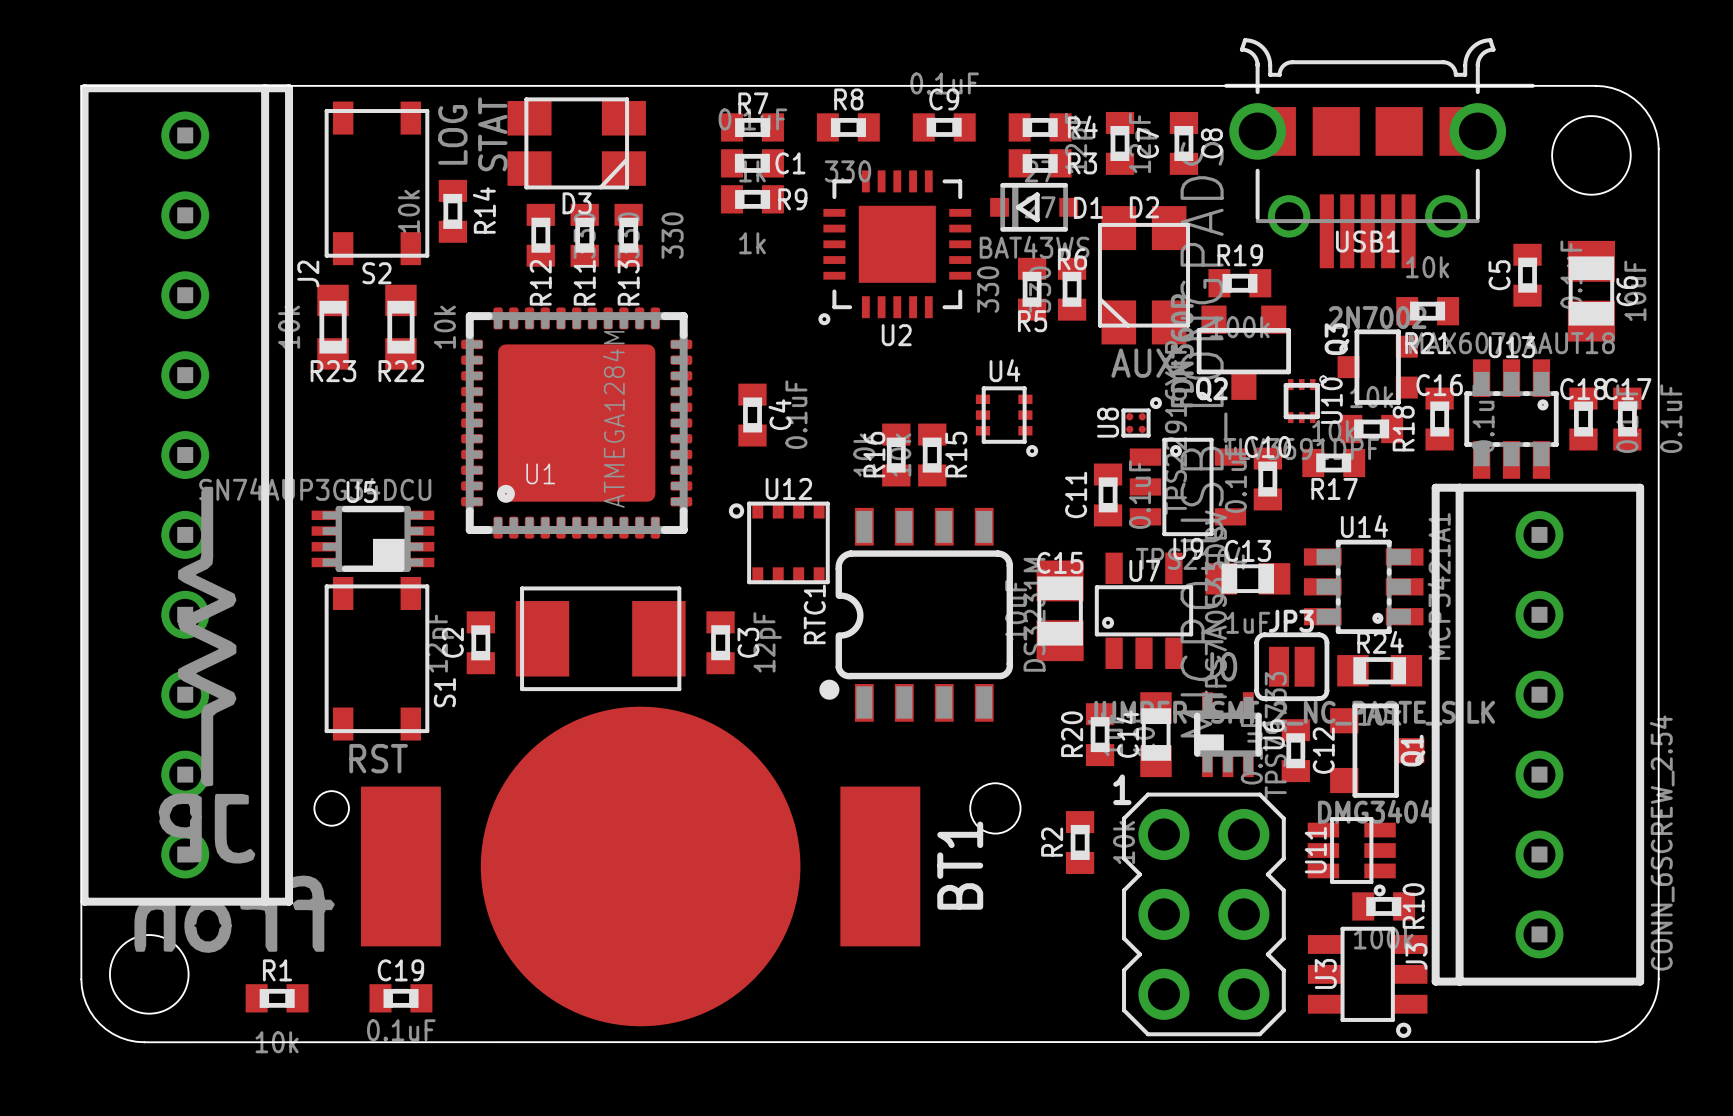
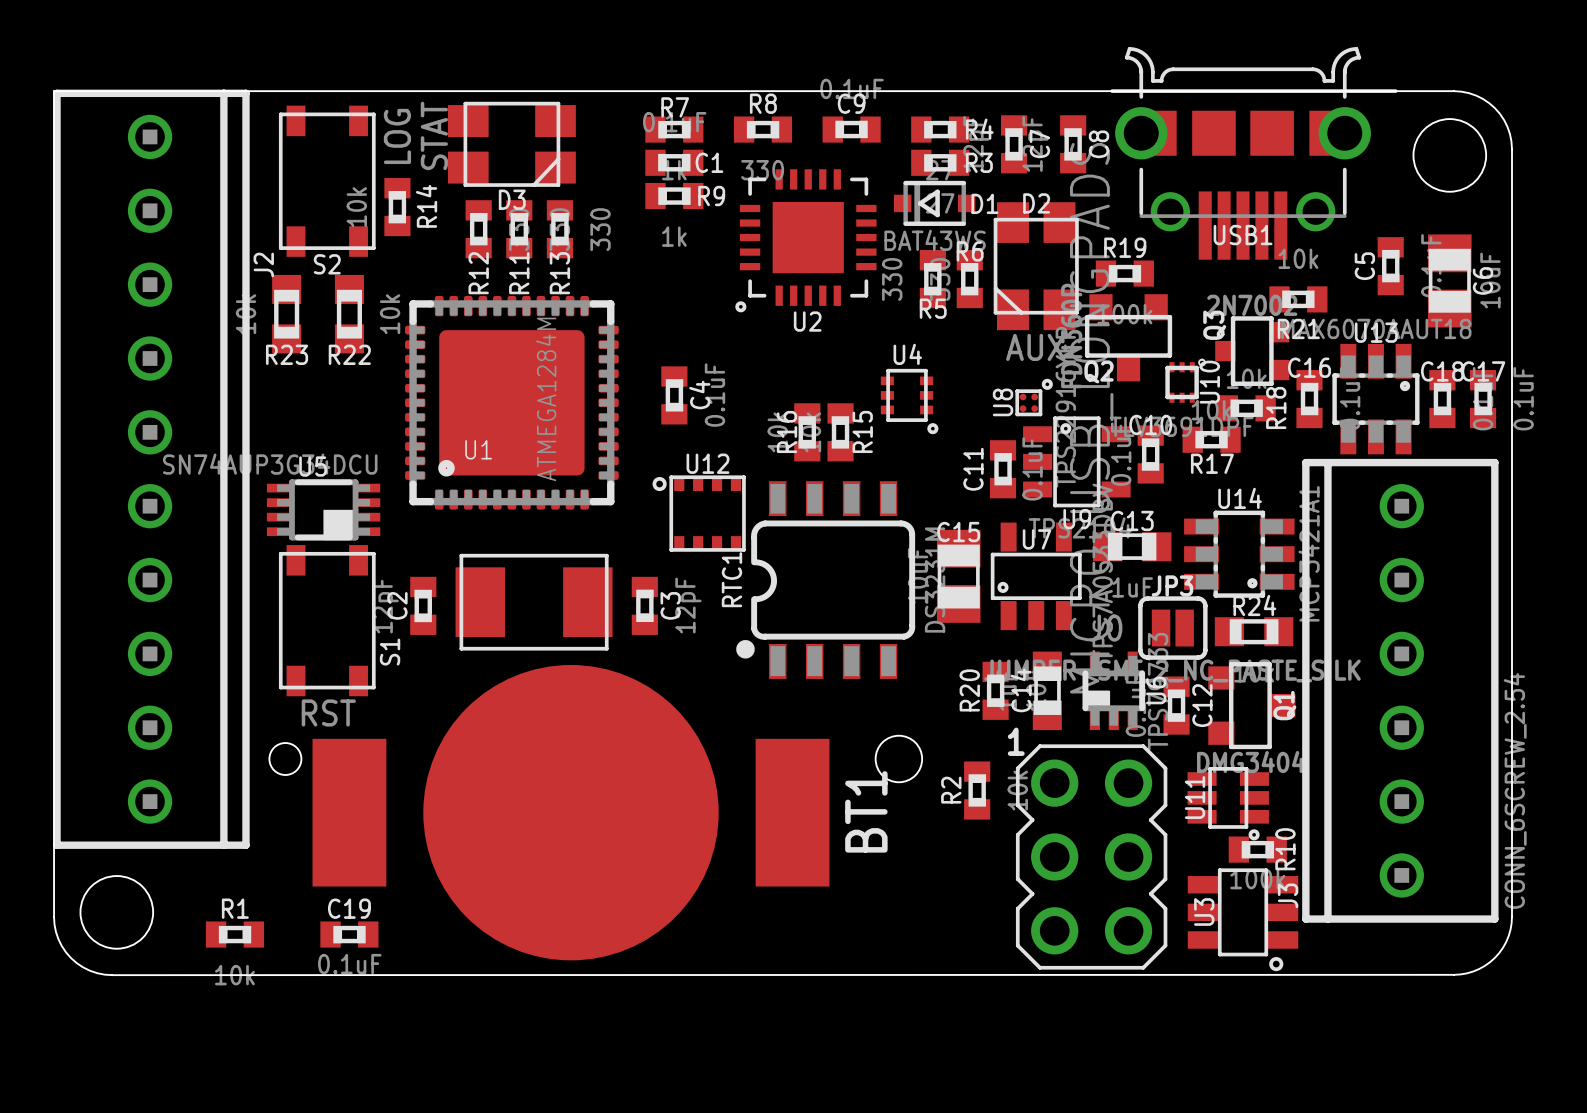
drawing: [134, 486, 335, 953] -> none

